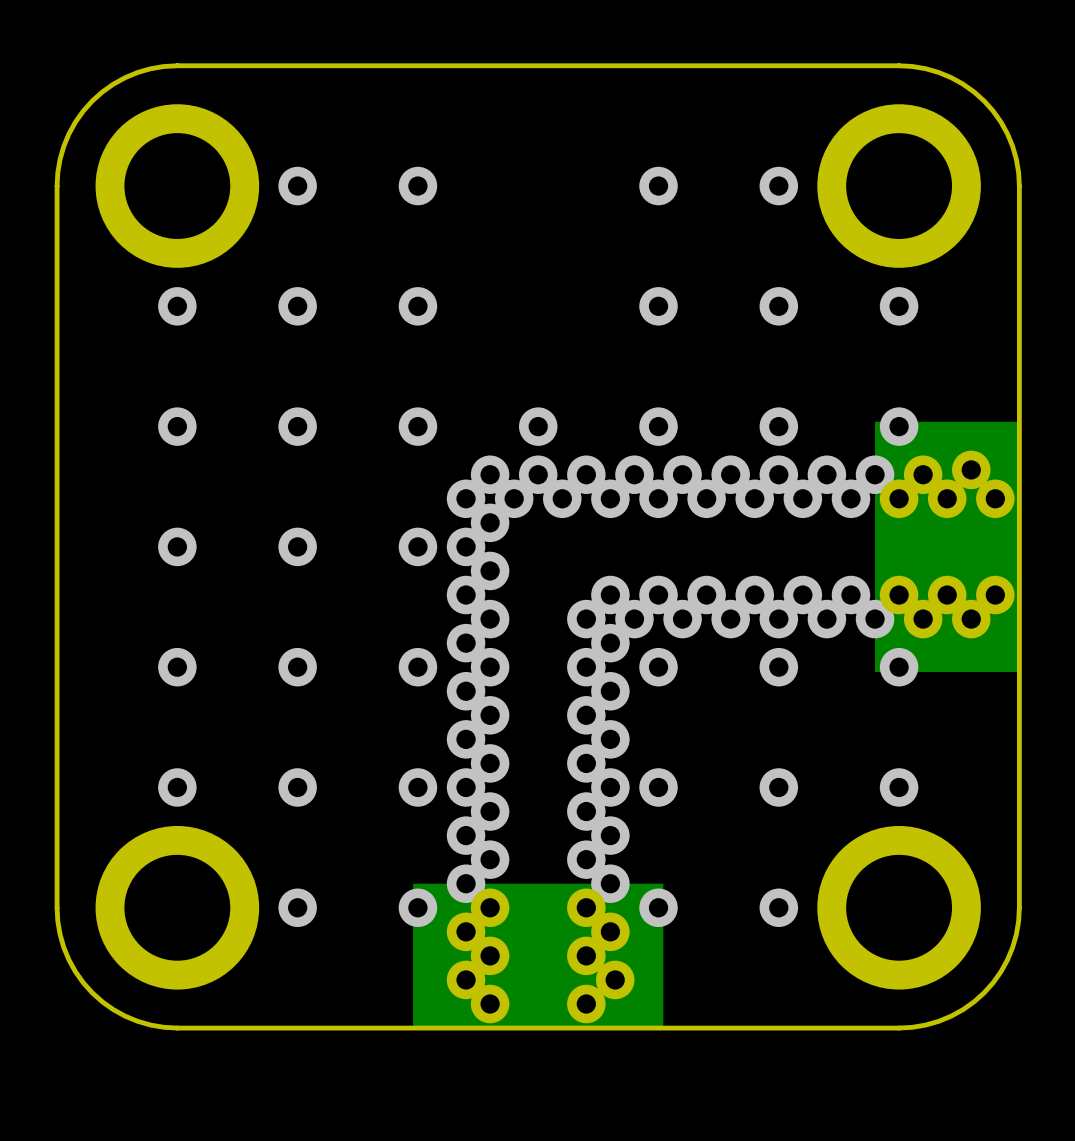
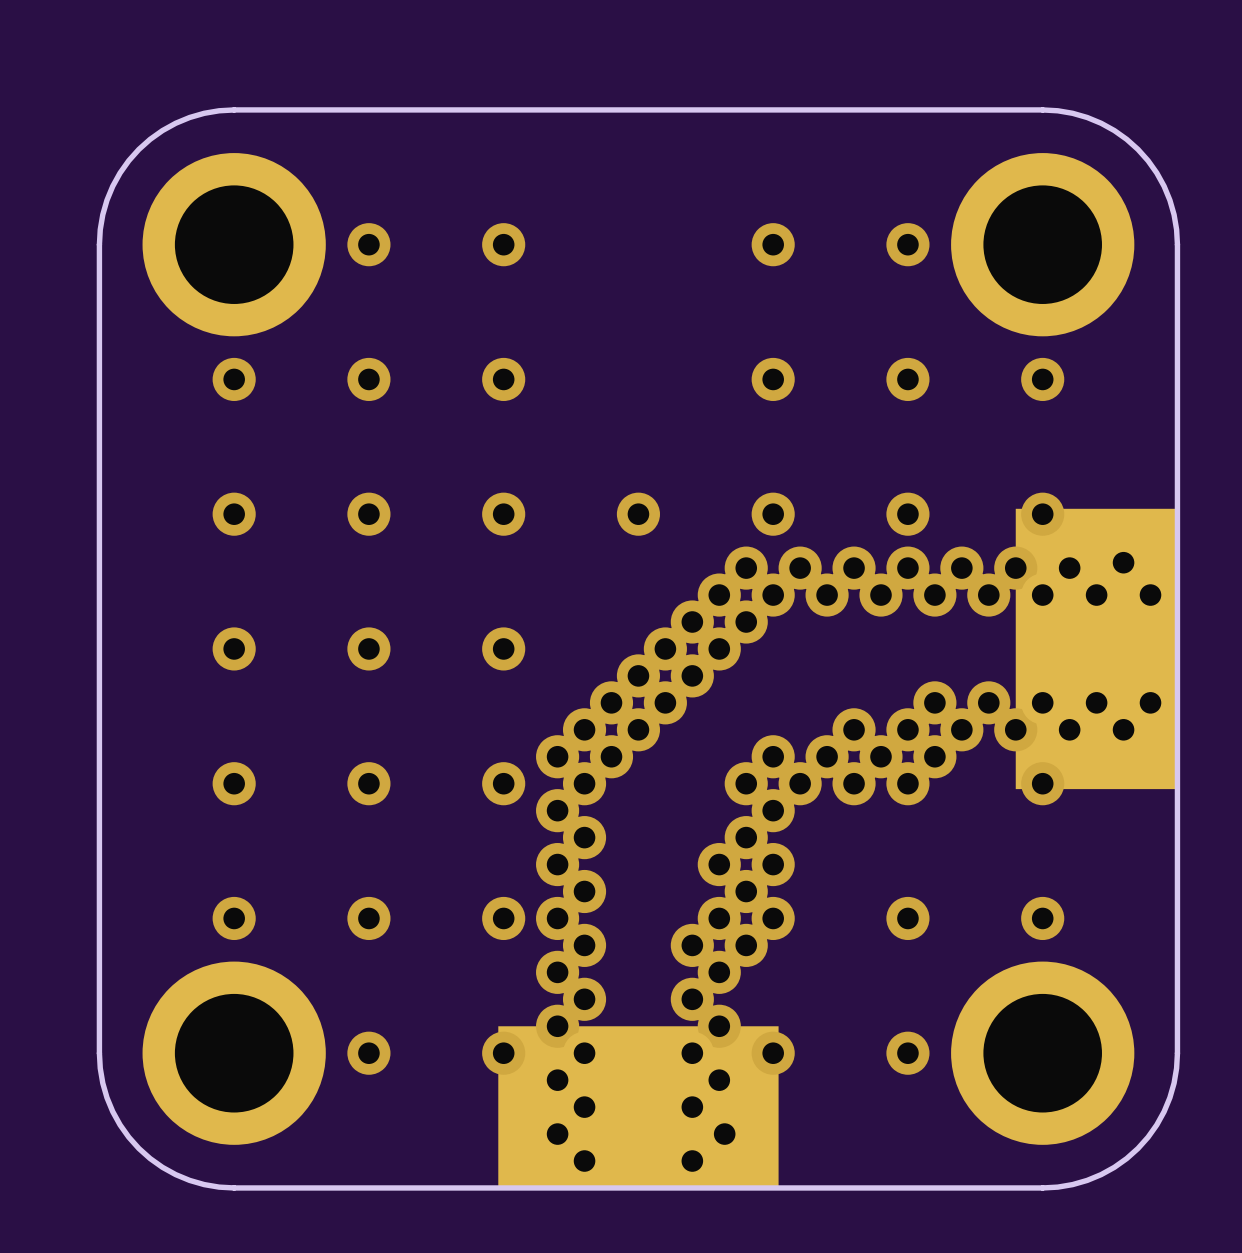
via: (490, 474) -> none
via: (538, 474) -> none
via: (586, 474) -> none
via: (466, 498) -> none
via: (514, 498) -> none
via position: (562, 498) -> (692, 622)
via: (490, 522) -> none
via: none -> (746, 622)
via: (466, 546) -> none
via: none -> (665, 648)
via: none -> (719, 648)
via position: (490, 570) -> (611, 702)
via: none -> (638, 675)
via: (466, 595) -> none
via position: (610, 595) -> (692, 675)
via: (658, 595) -> none
via: (706, 595) -> none
via: (754, 595) -> none
via: none -> (638, 729)
via position: (586, 619) -> (665, 702)
via: (634, 619) -> none
via: (682, 619) -> none
via: none -> (611, 756)
via: (610, 643) -> none
via: none -> (773, 756)
via: none -> (827, 756)
via: none -> (880, 756)
via: none -> (934, 756)
via: (586, 667) -> none
via: none -> (746, 783)
via: (658, 667) -> none
via: none -> (800, 783)
via: none -> (854, 783)
via: (610, 691) -> none
via: none -> (773, 810)
via: (586, 715) -> none
via: none -> (746, 837)
via: none -> (773, 864)
via: (586, 763) -> none
via: none -> (746, 891)
via: none -> (746, 945)

